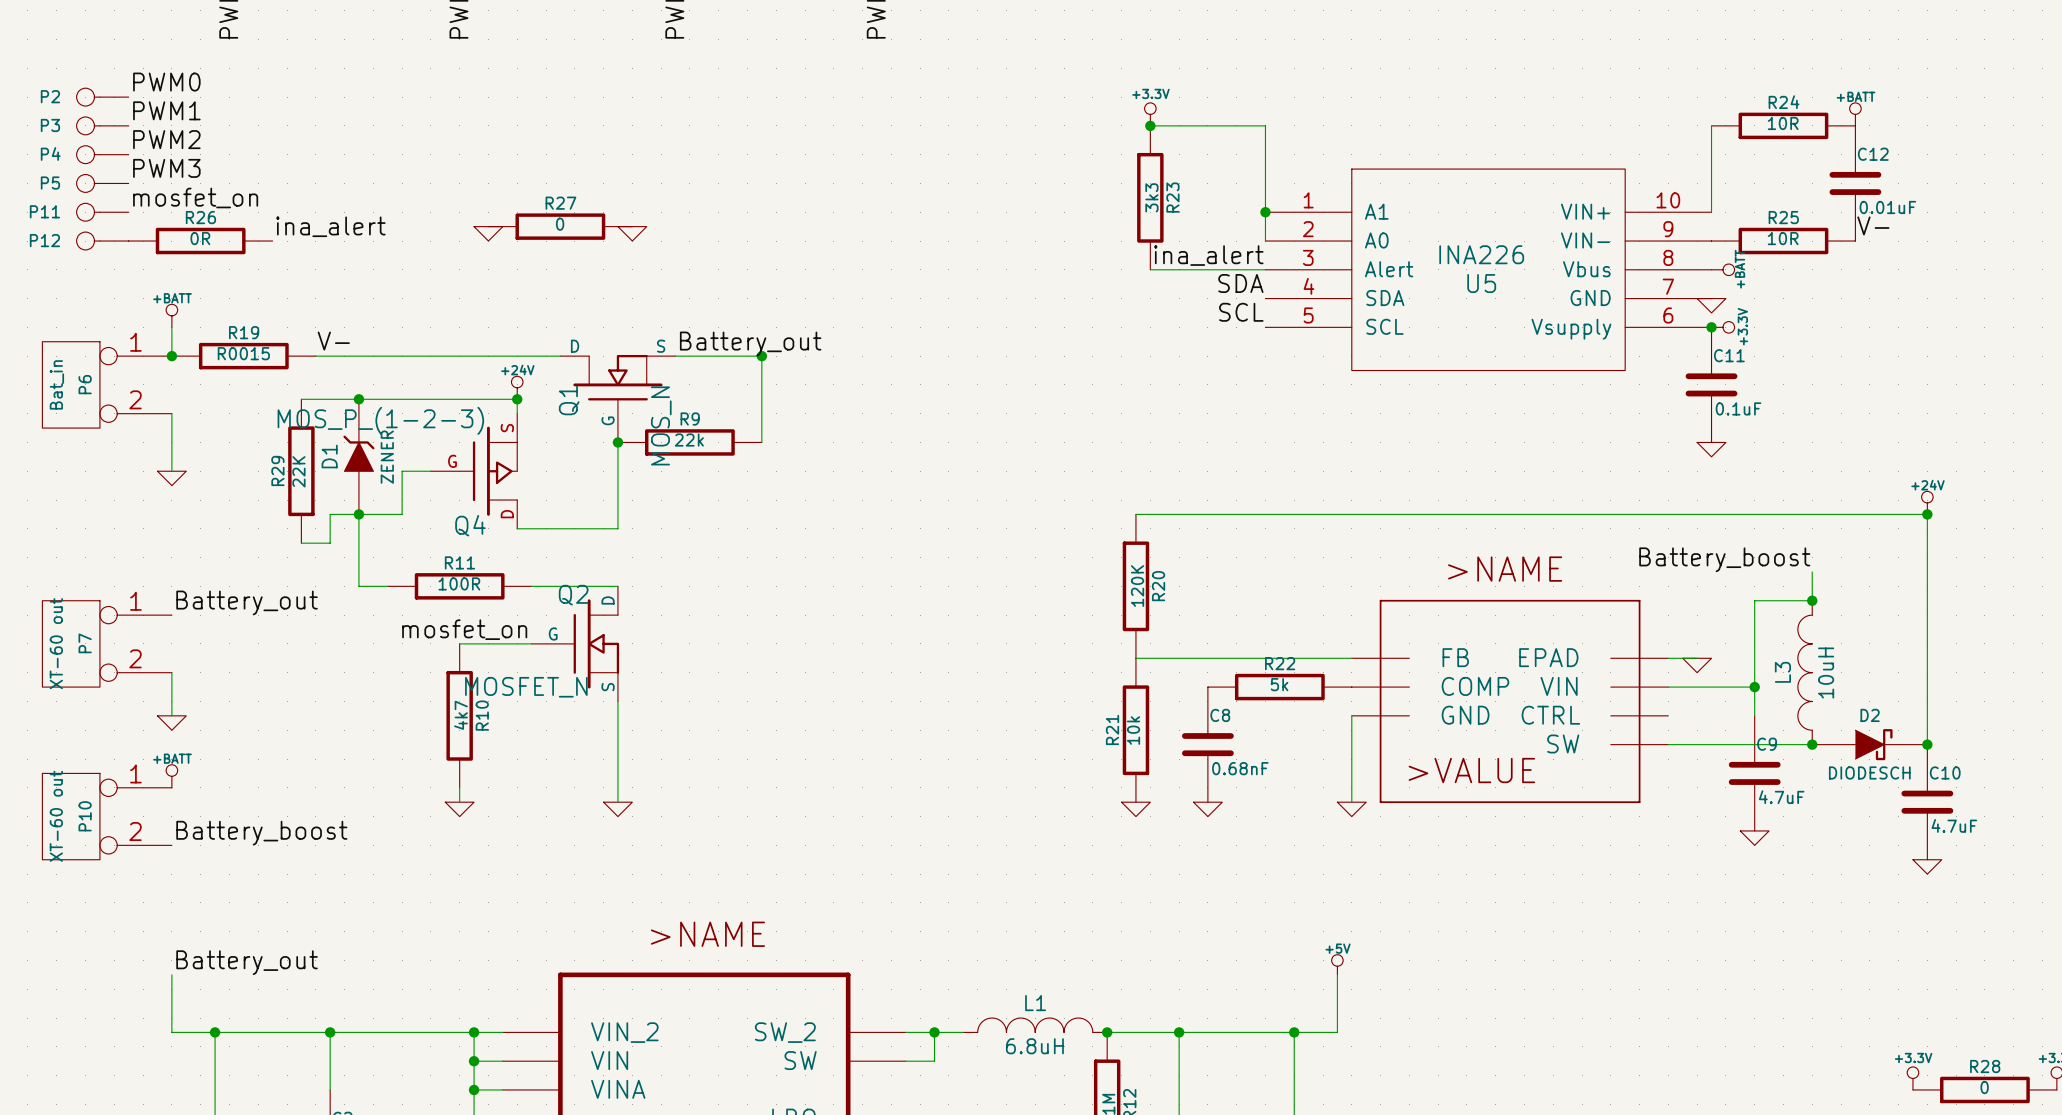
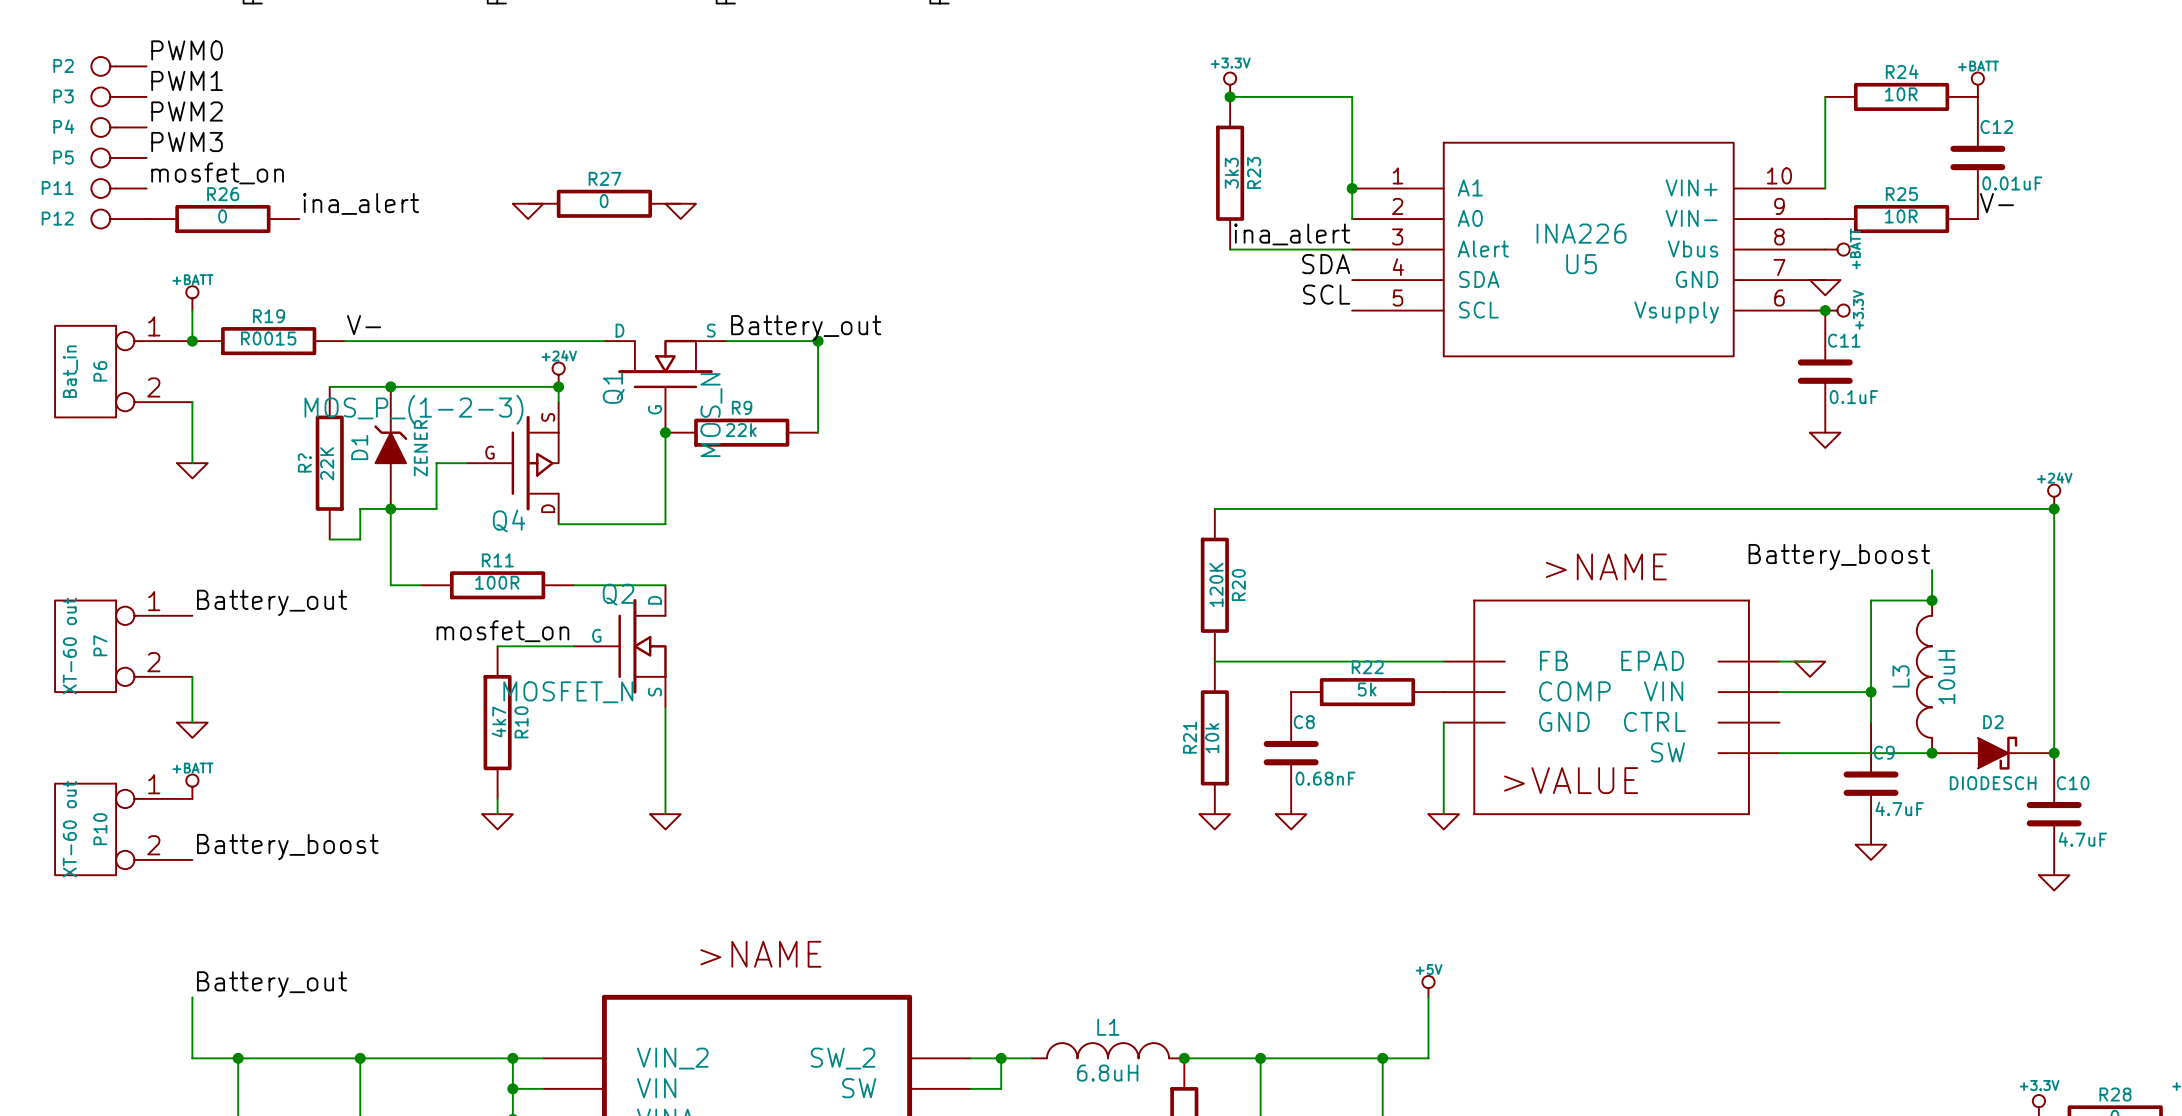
R26 value: 0R (200, 238) -> 0 (222, 216)
R29 name: R29 (277, 470) -> R? (304, 462)

